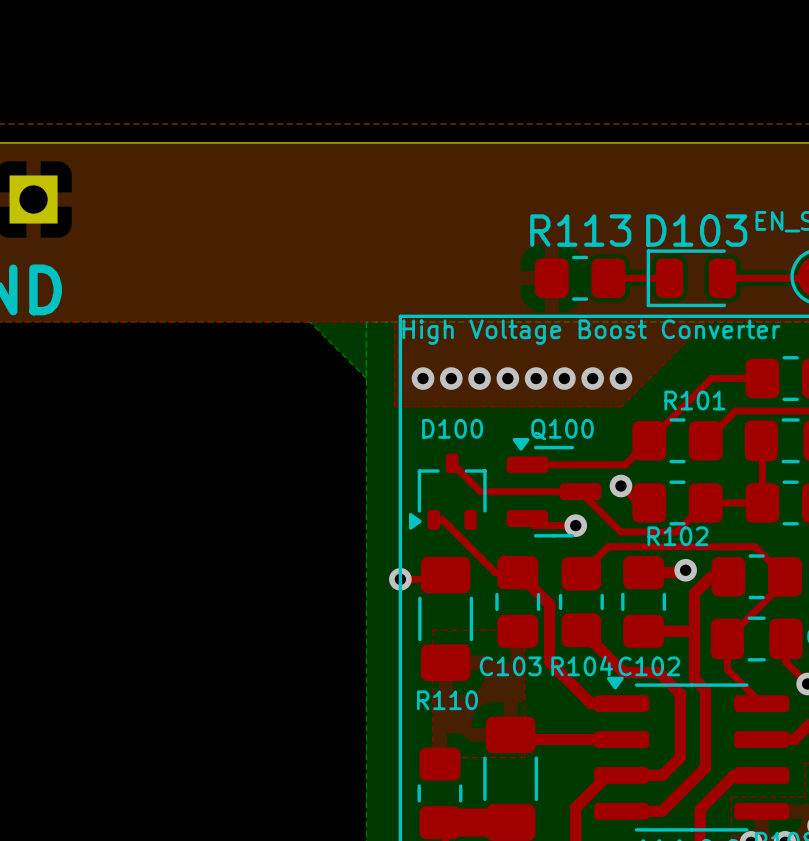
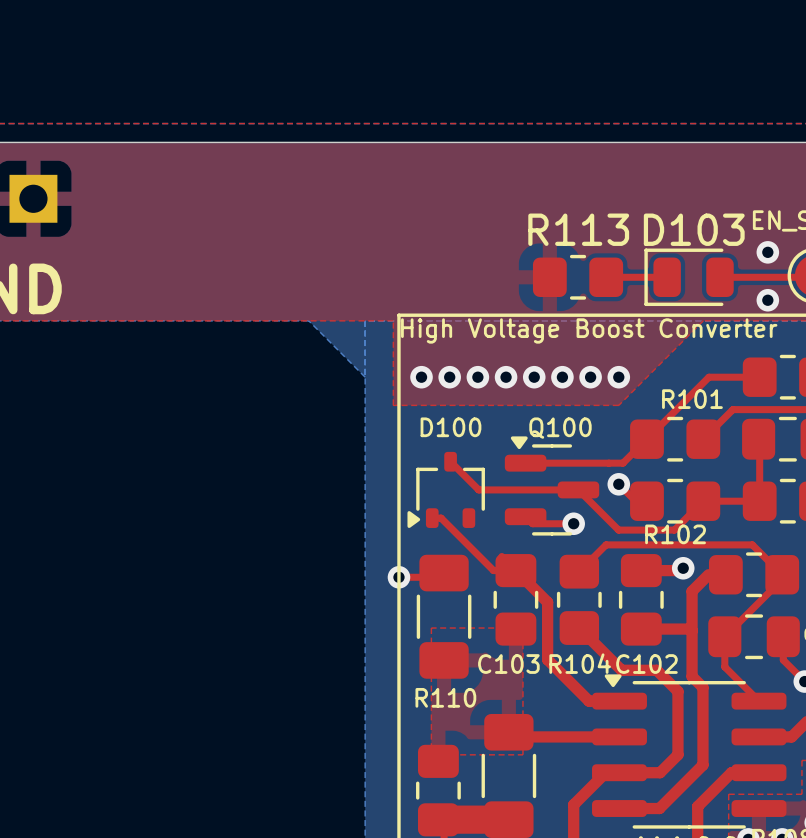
via: none -> (767, 252)
via: none -> (767, 300)

